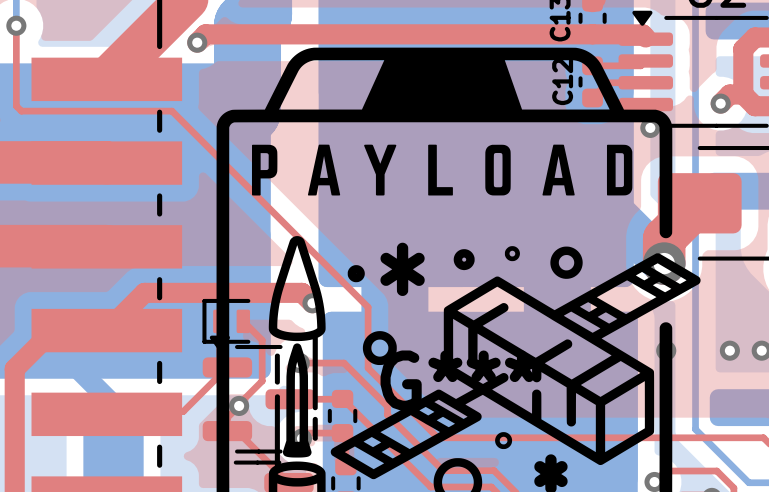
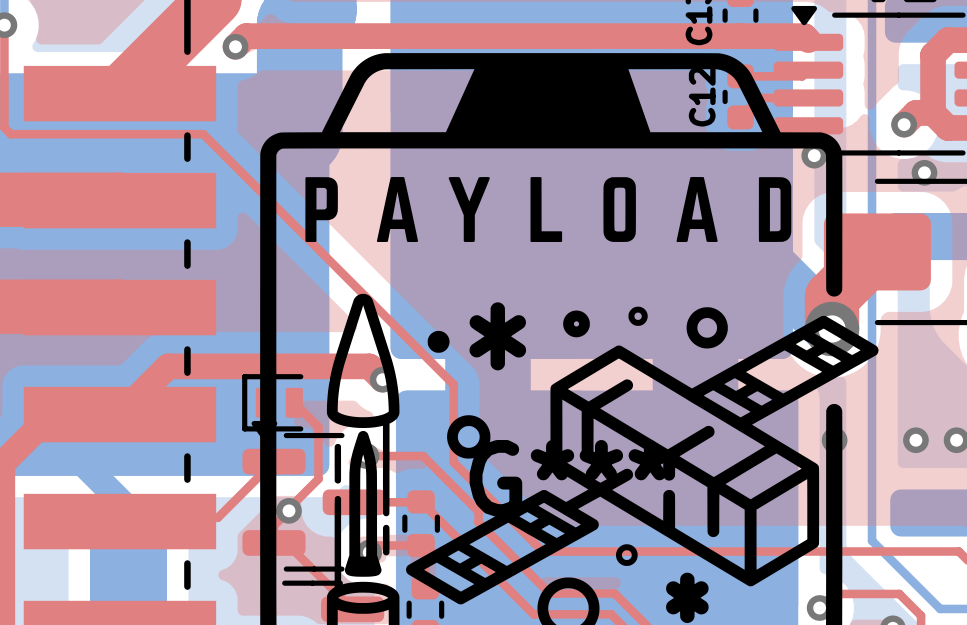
via: none -> (924, 172)

